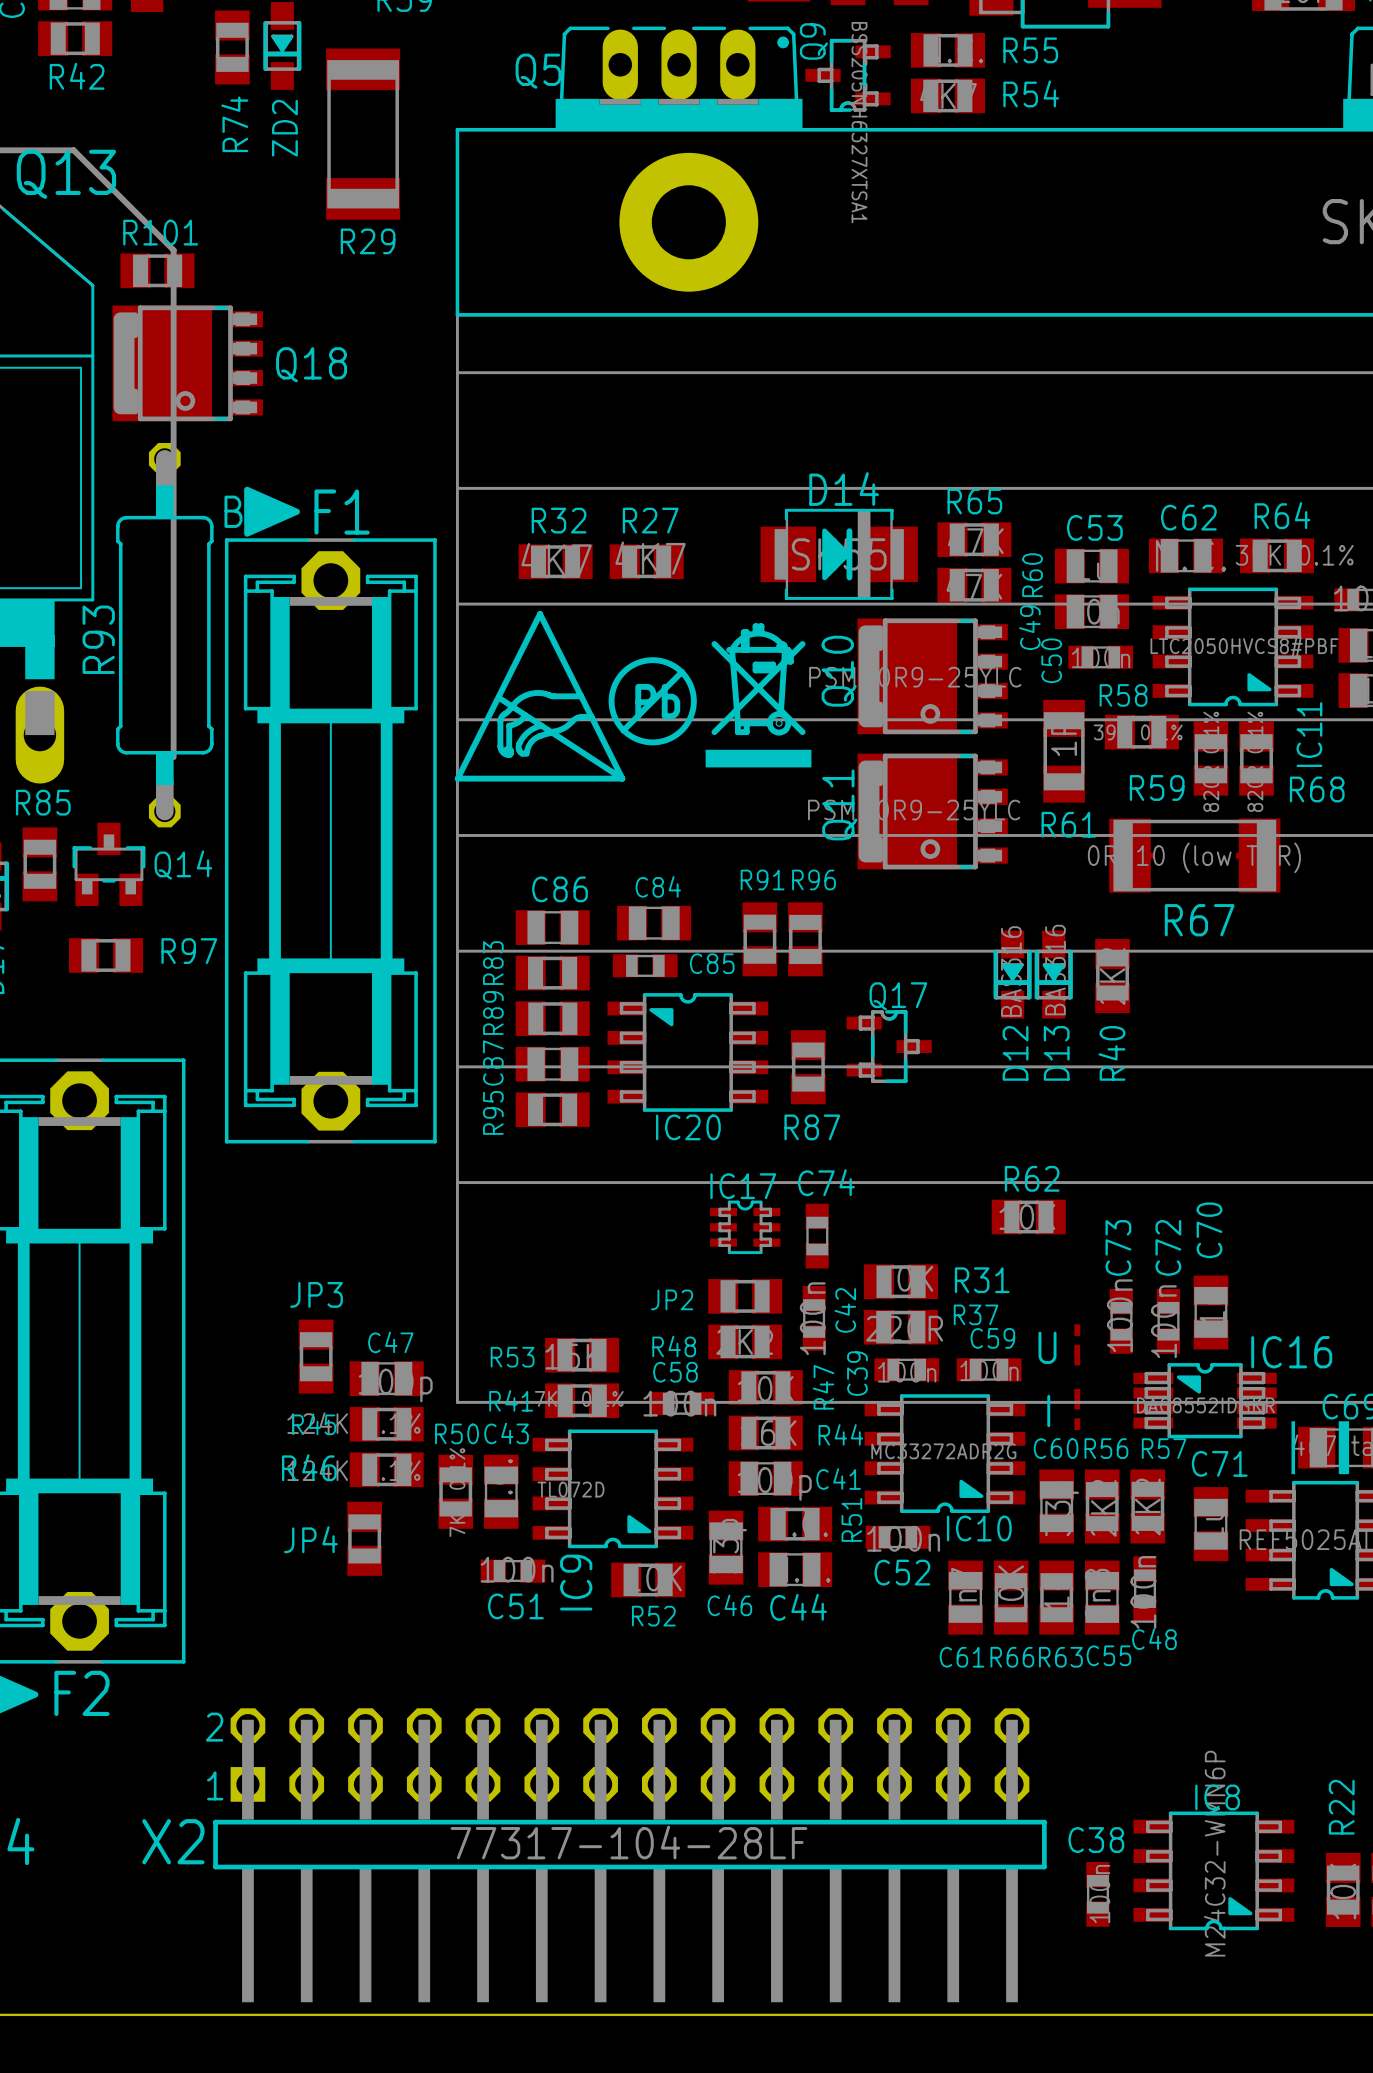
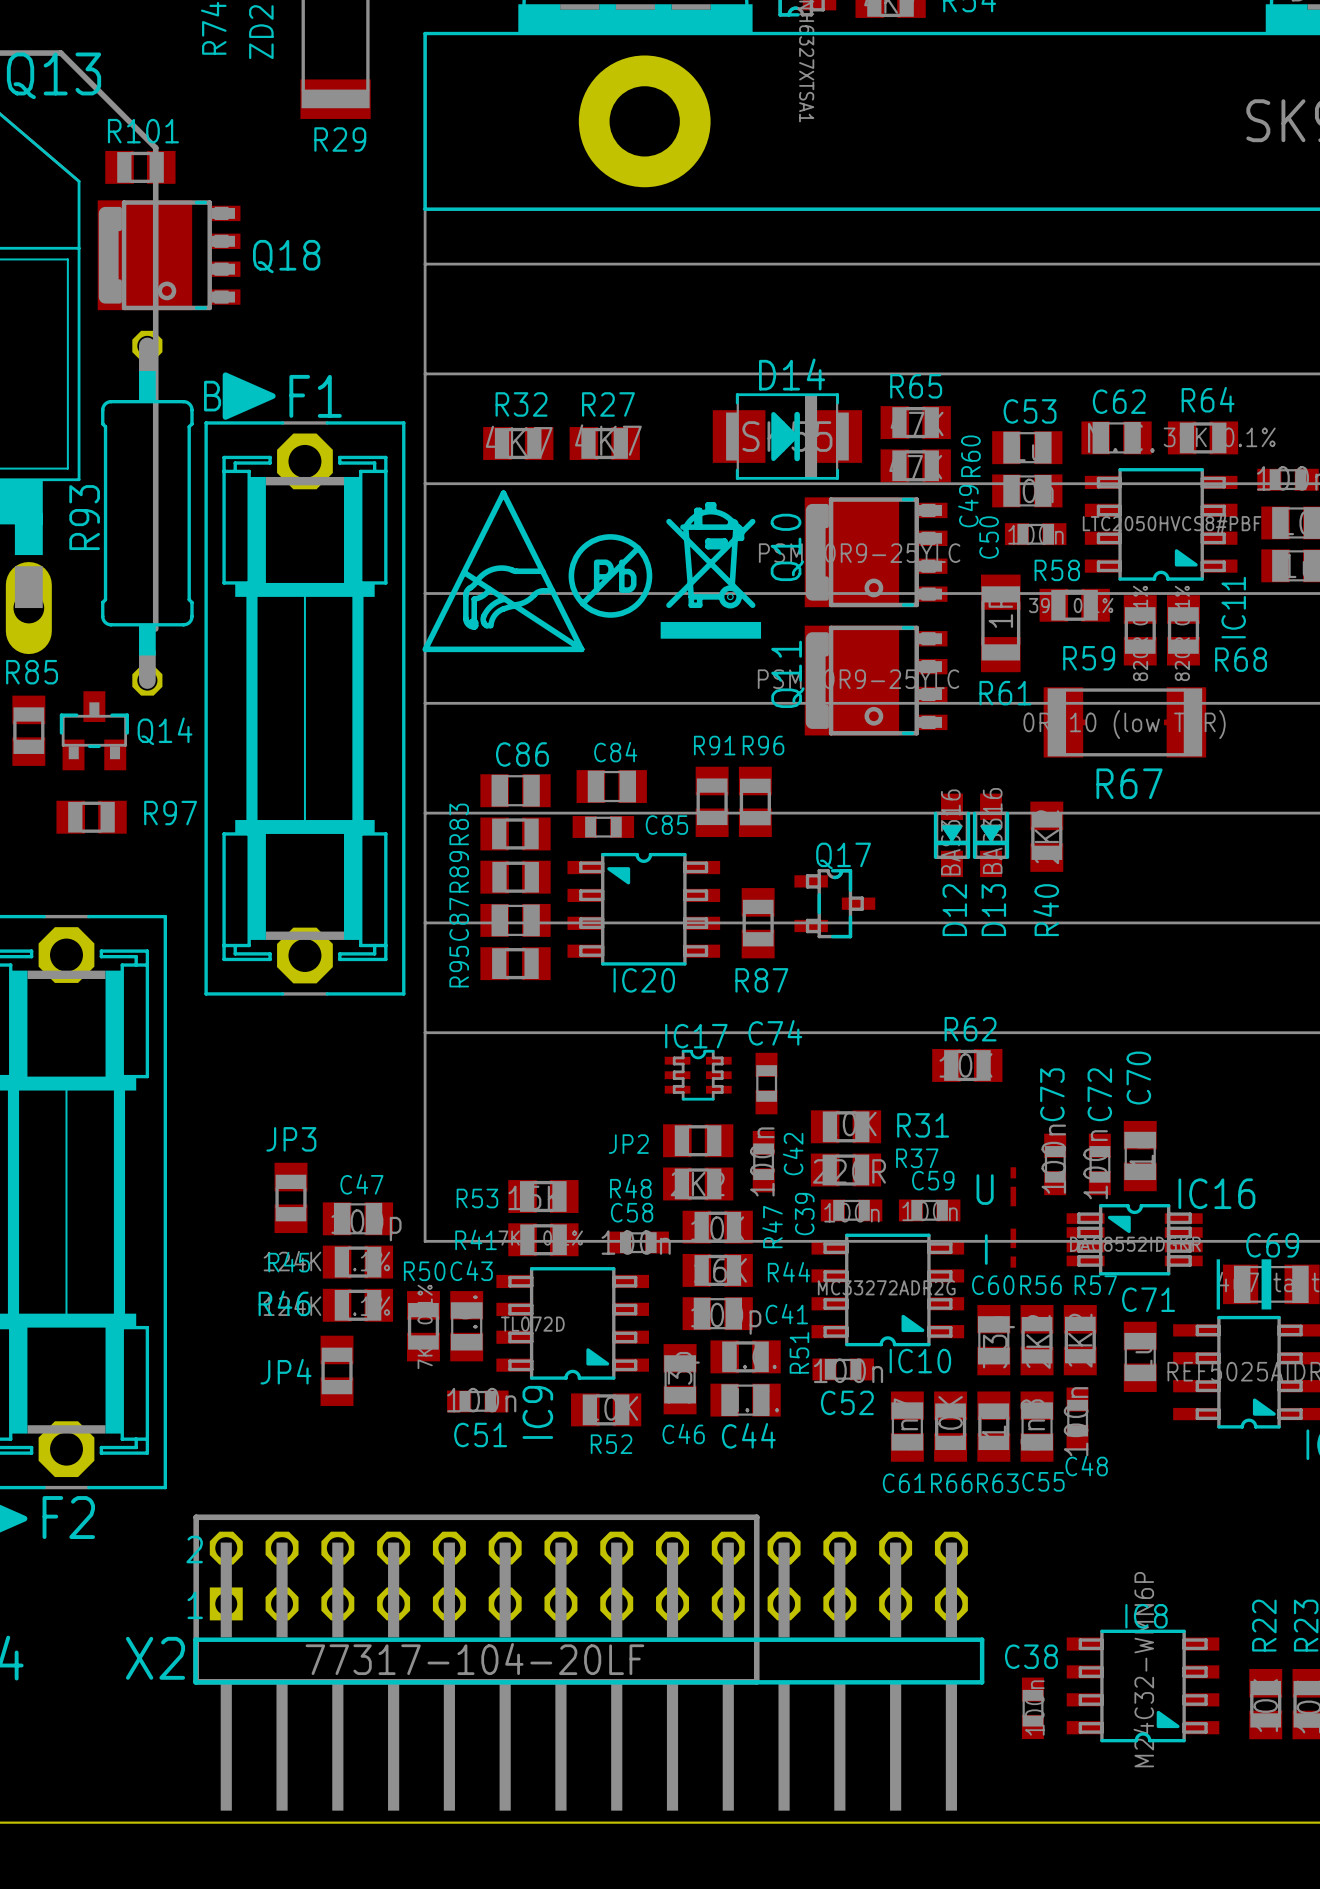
line: none -> (196, 1517) (756, 1517) (756, 1681) (196, 1681) (196, 1517)
X2 value: 77317-104-28LF (628, 1842) -> 77317-104-20LF (474, 1659)

